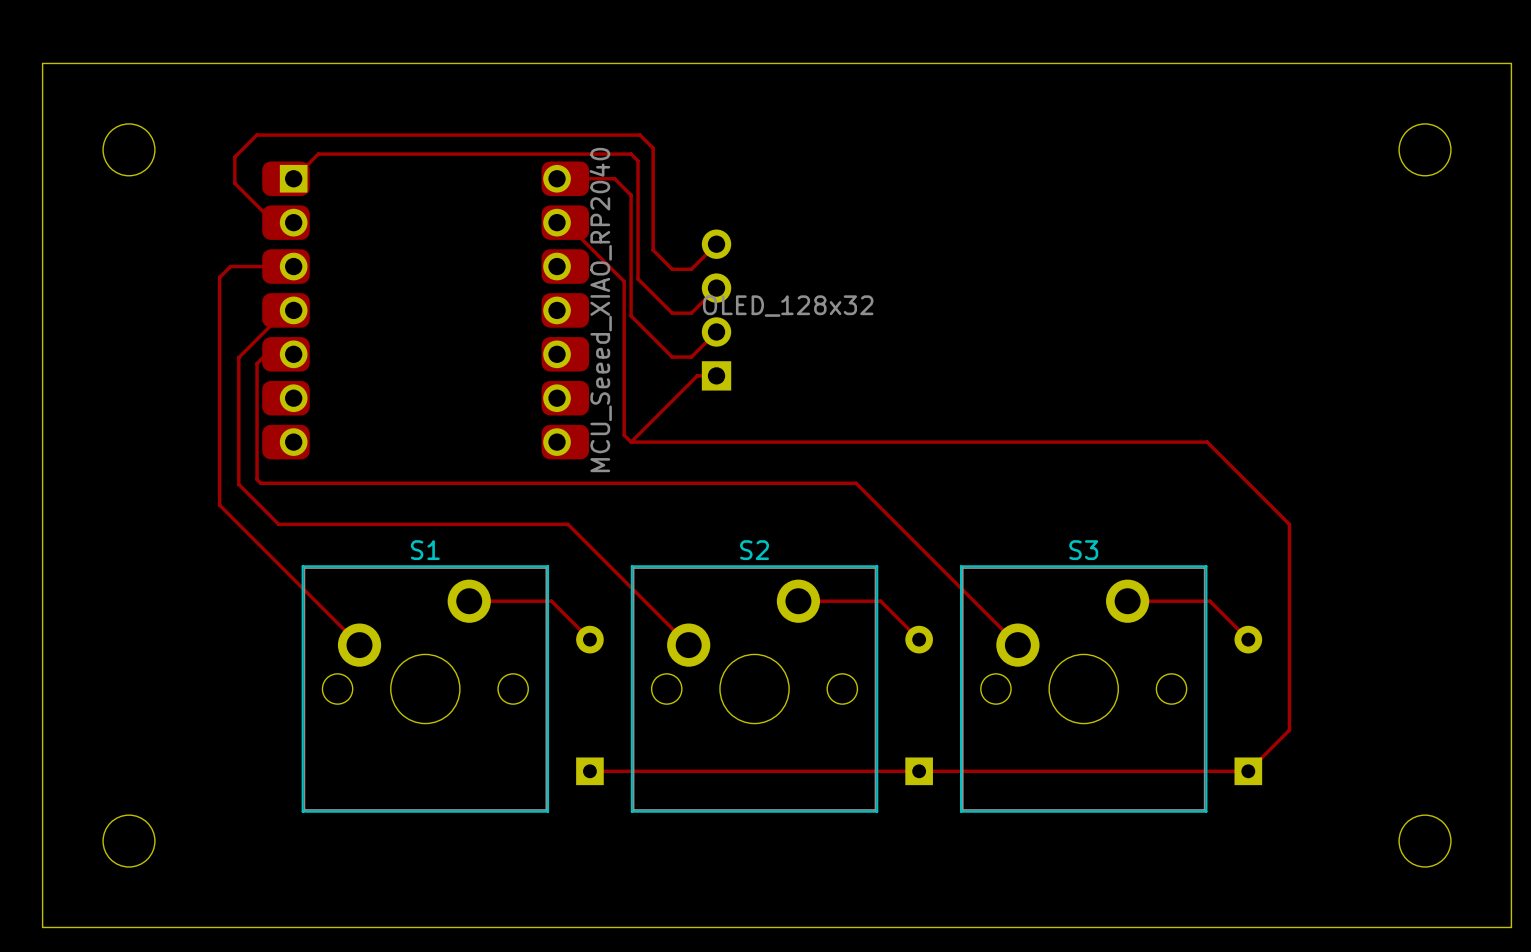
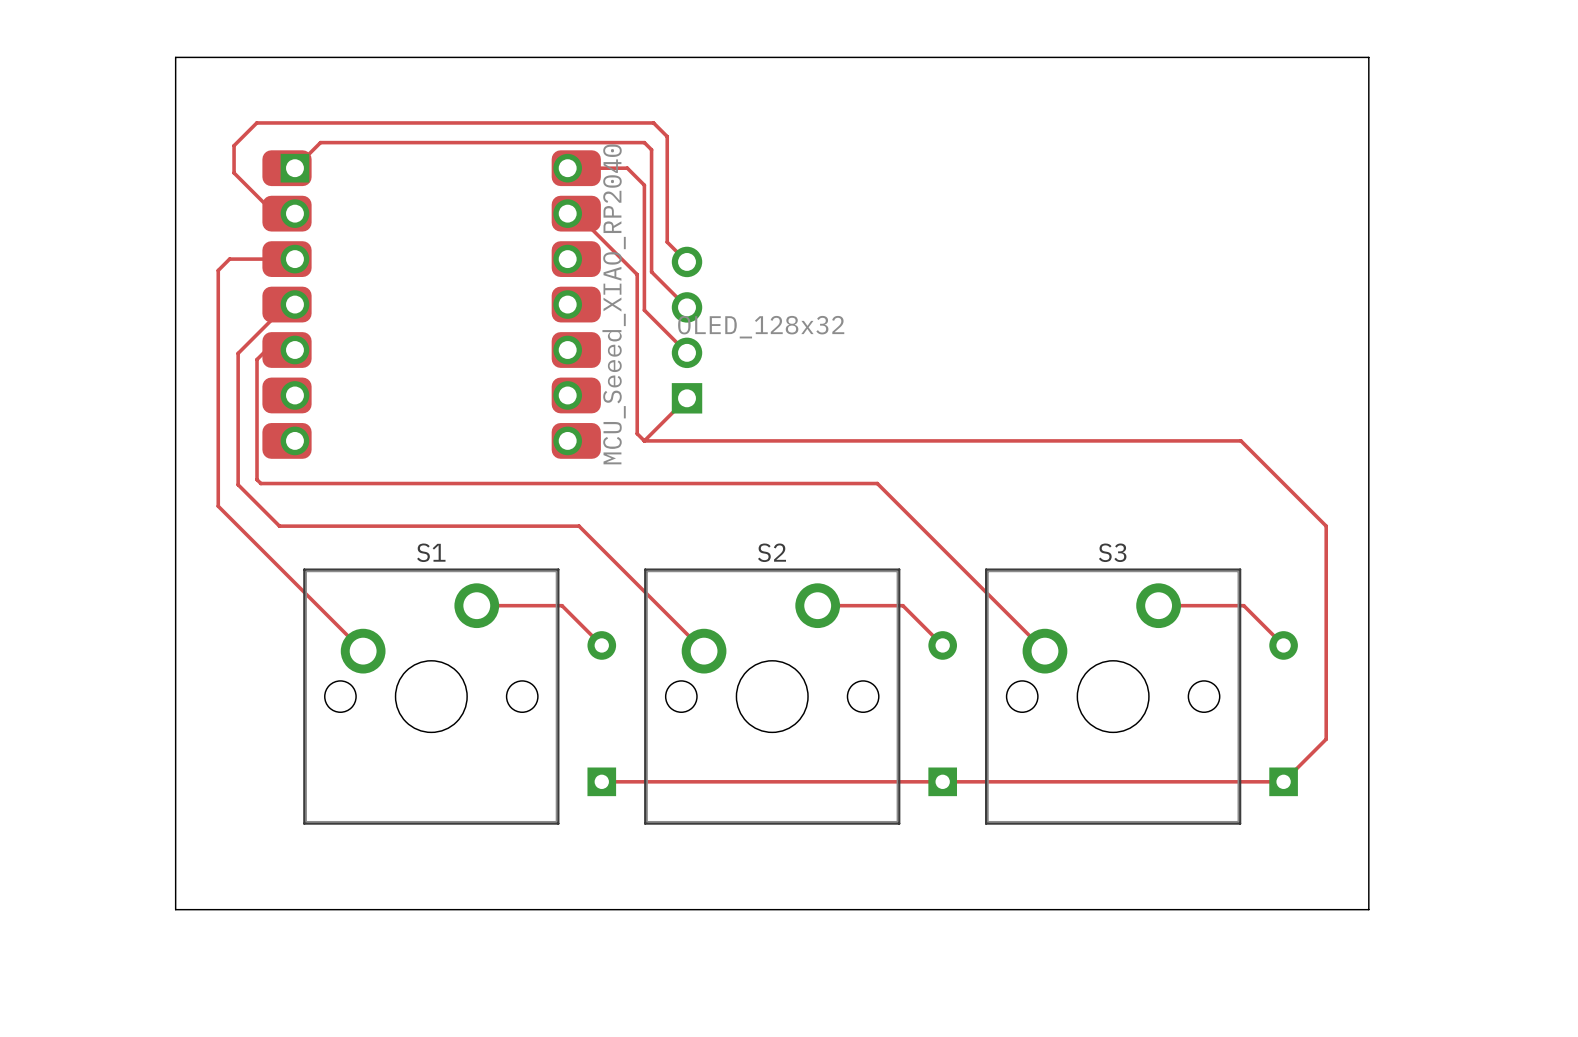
board edge: (42, 63) (1511, 63) (1511, 927) (42, 927) (42, 63) -> (175, 57) (175, 909) (1368, 909) (1368, 57) (175, 57)
round board edge: [102, 123, 156, 177] -> none
round board edge: [1398, 123, 1452, 177] -> none
track: (716, 244) (691, 269) (672, 269) -> none
track: (716, 288) (691, 313) (672, 313) -> none
part position: (716, 310) -> (687, 330)
track: (716, 331) (691, 357) (672, 357) -> none
track: (716, 375) (697, 375) (672, 400) -> none
round board edge: [102, 814, 156, 868] -> none
round board edge: [1398, 814, 1452, 868] -> none

